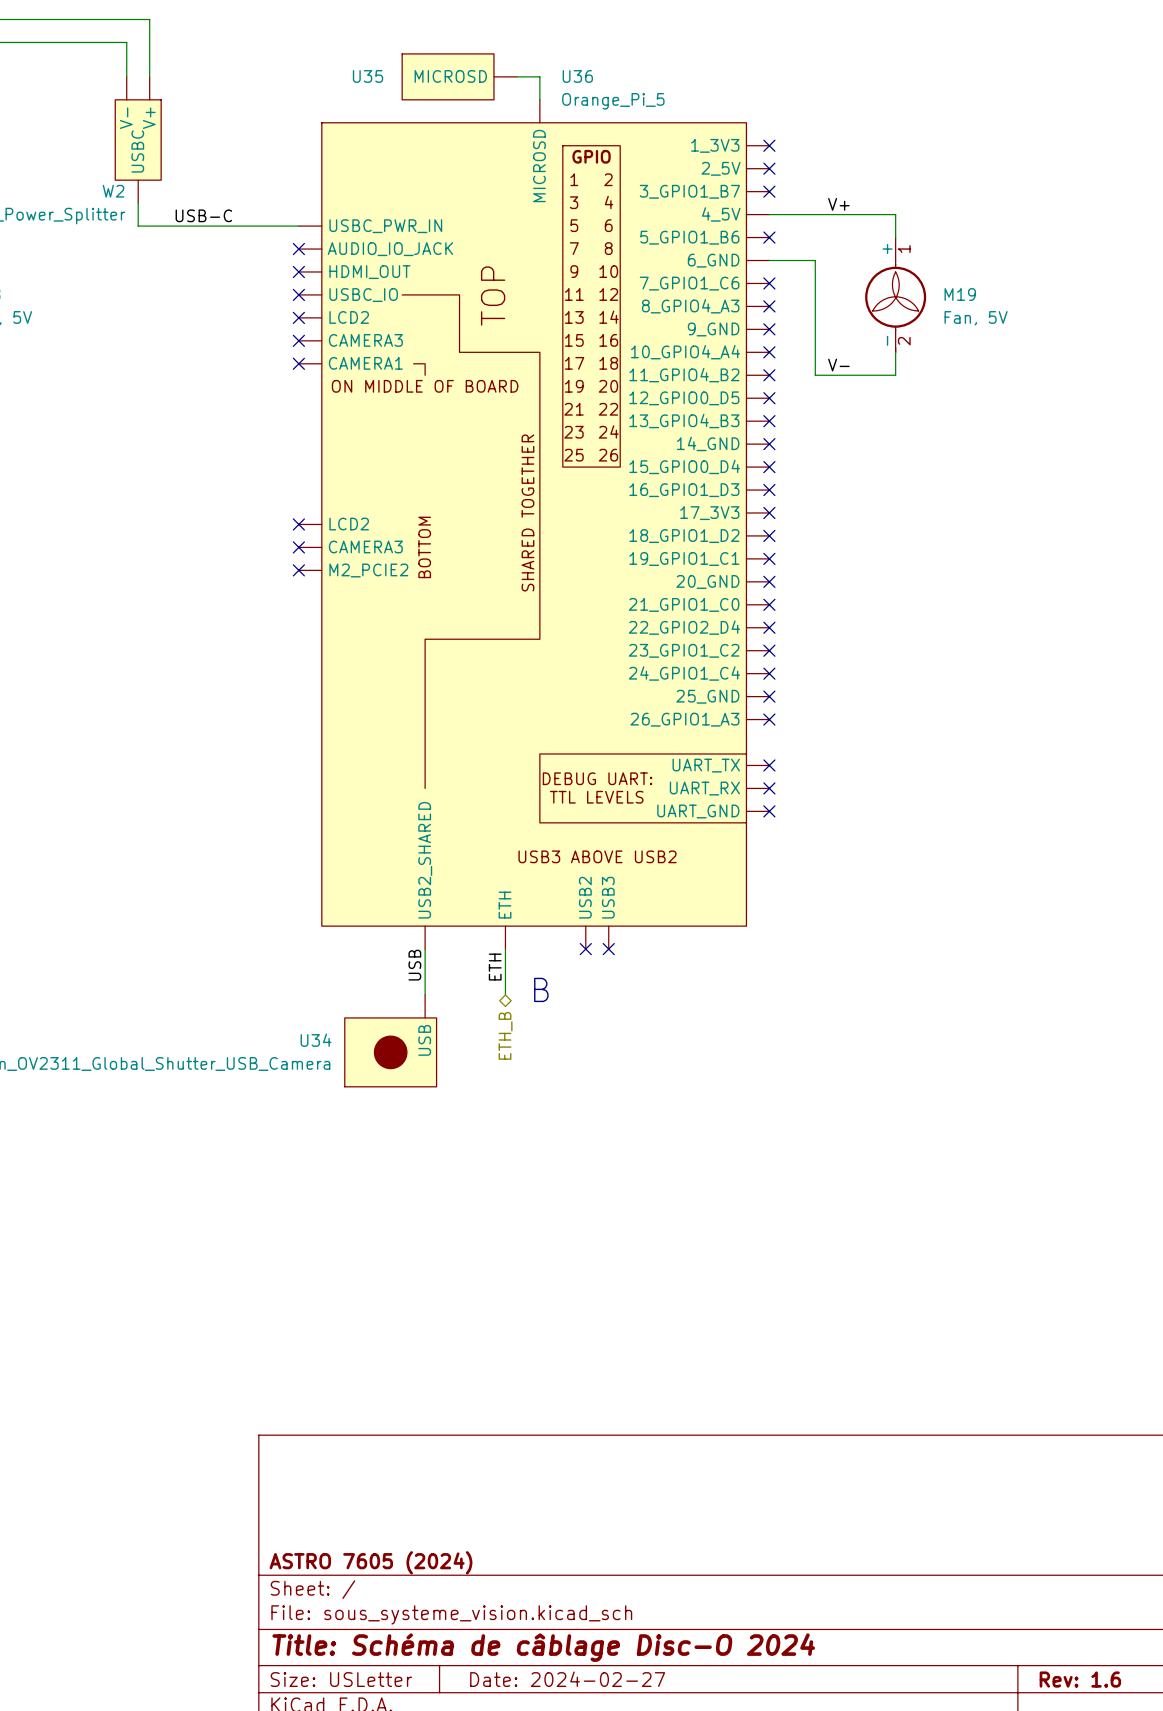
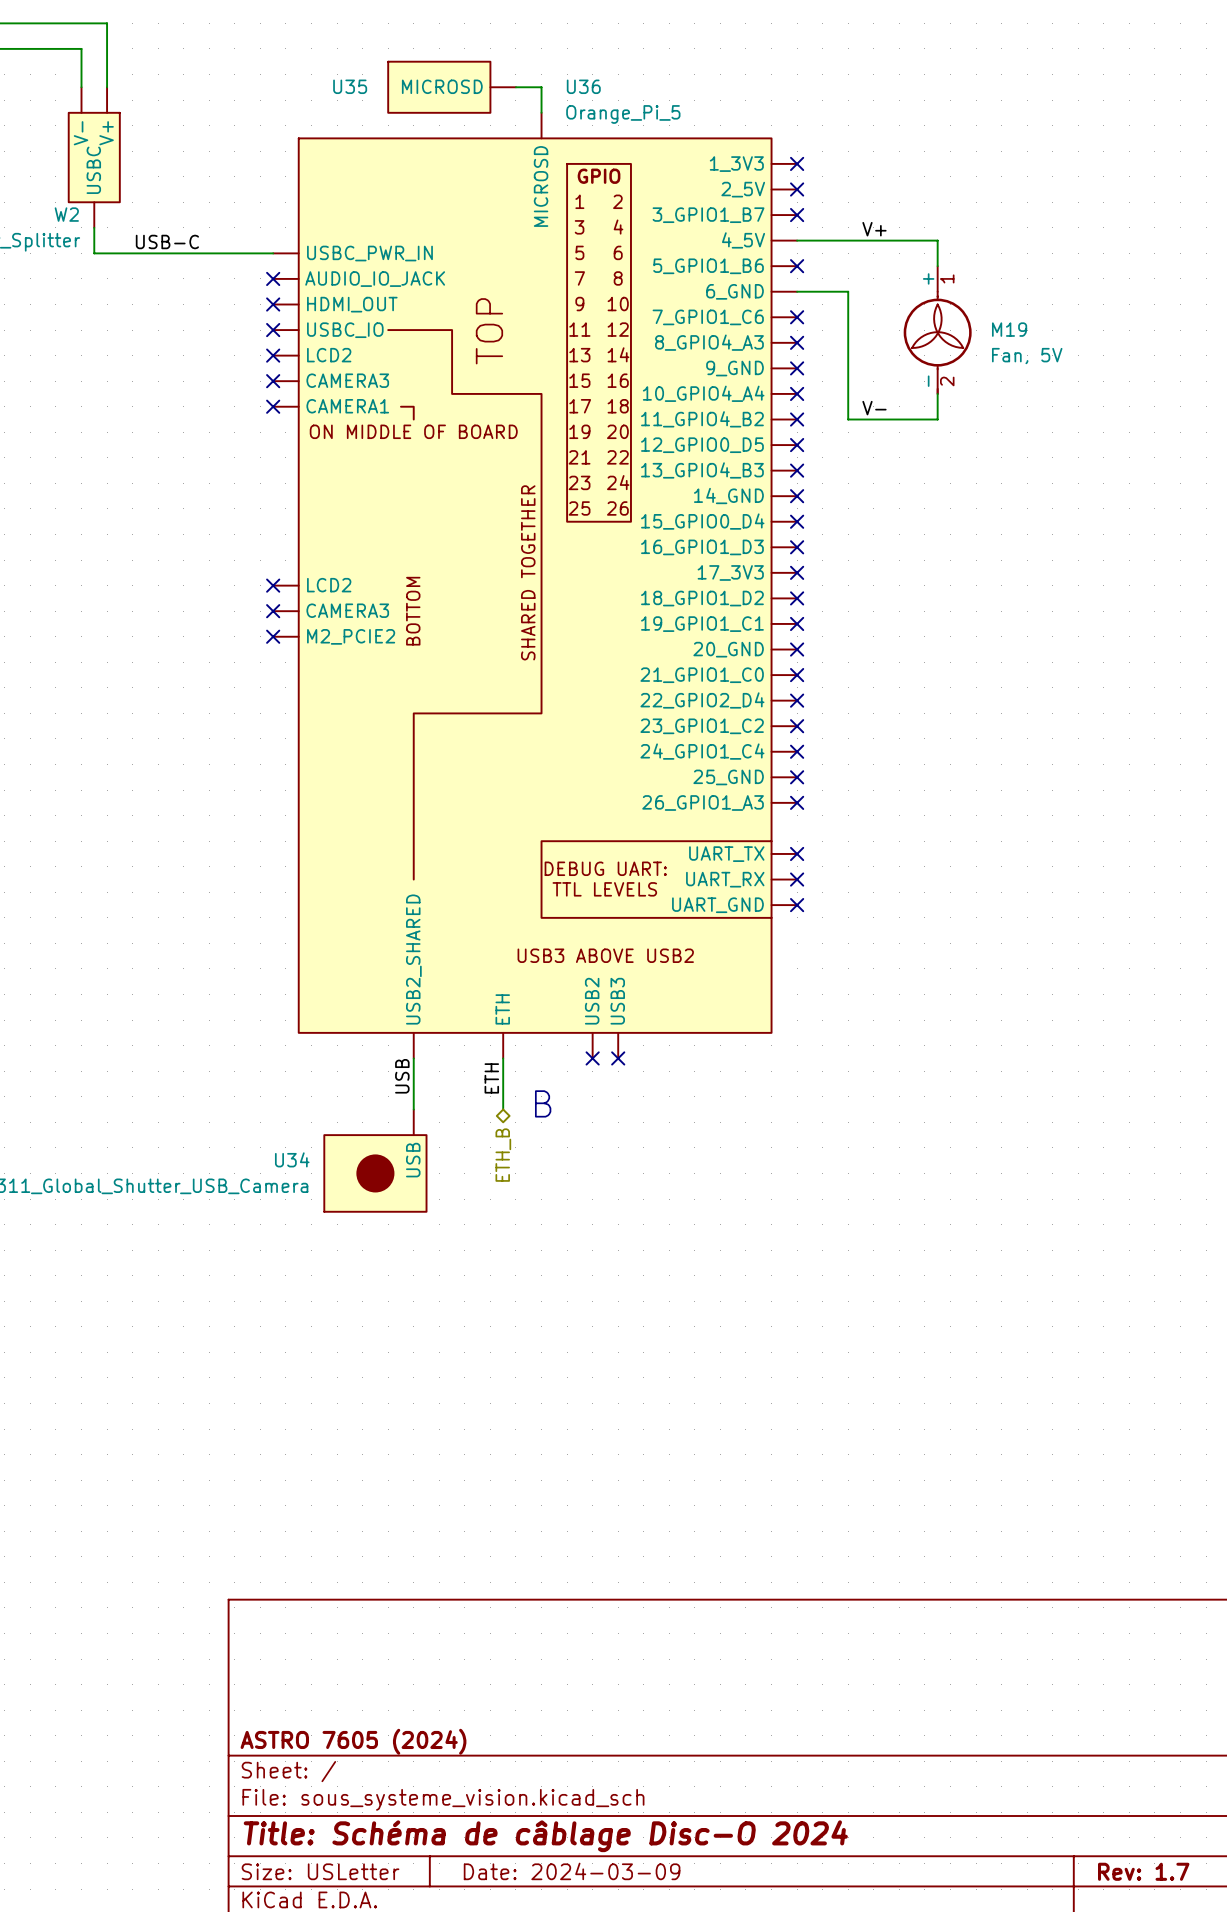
title block: Date: 2024-02-27 (567, 1679) -> Date: 2024-03-09 (572, 1871)
title block: Rev: 1.6 (1080, 1679) -> Rev: 1.7 (1143, 1871)

